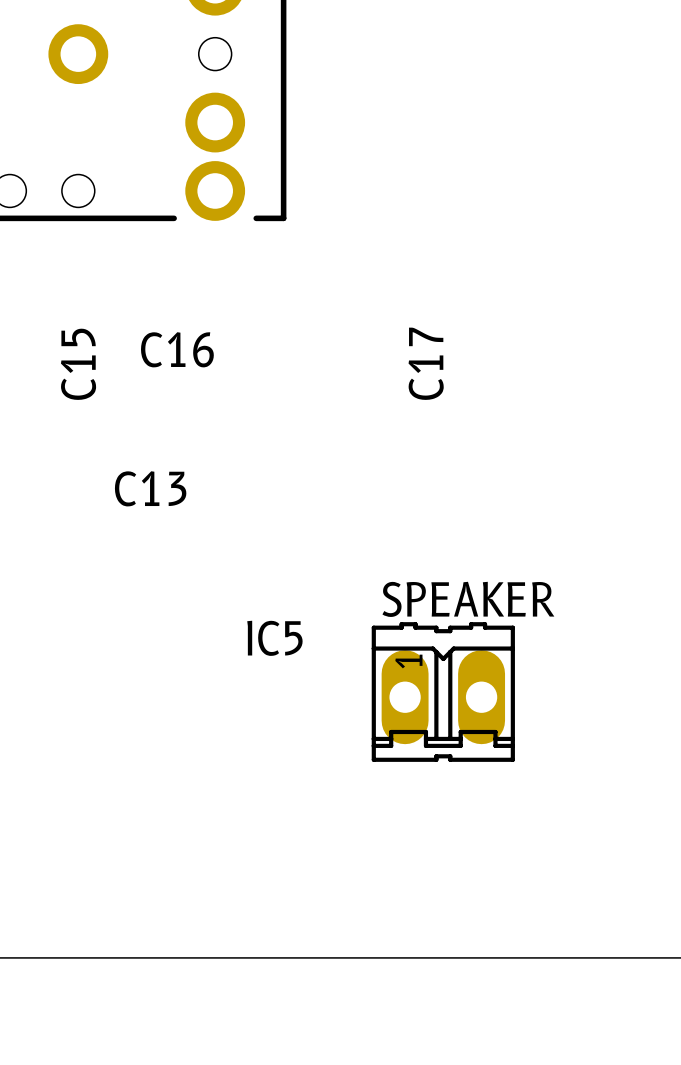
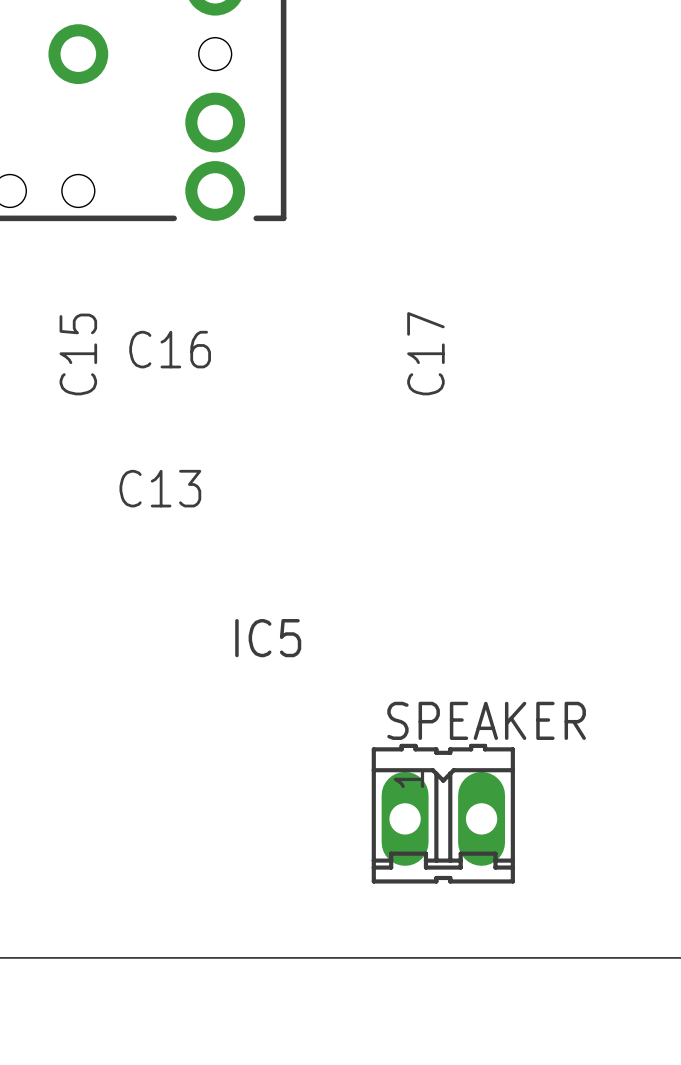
SPEAKER position: (443, 692) -> (443, 813)

